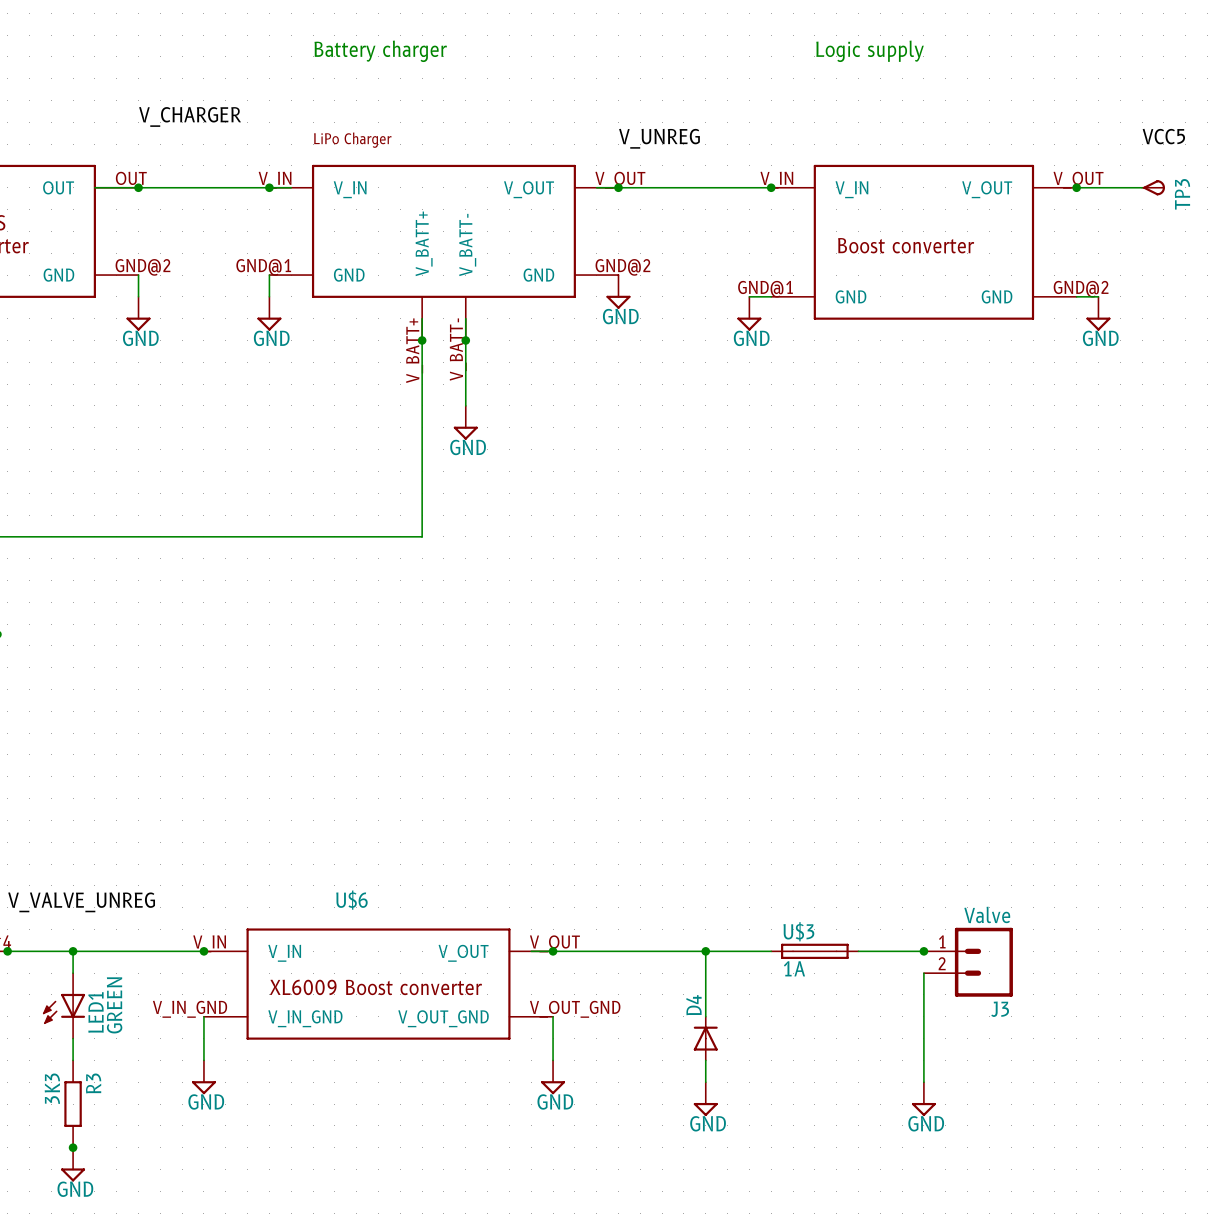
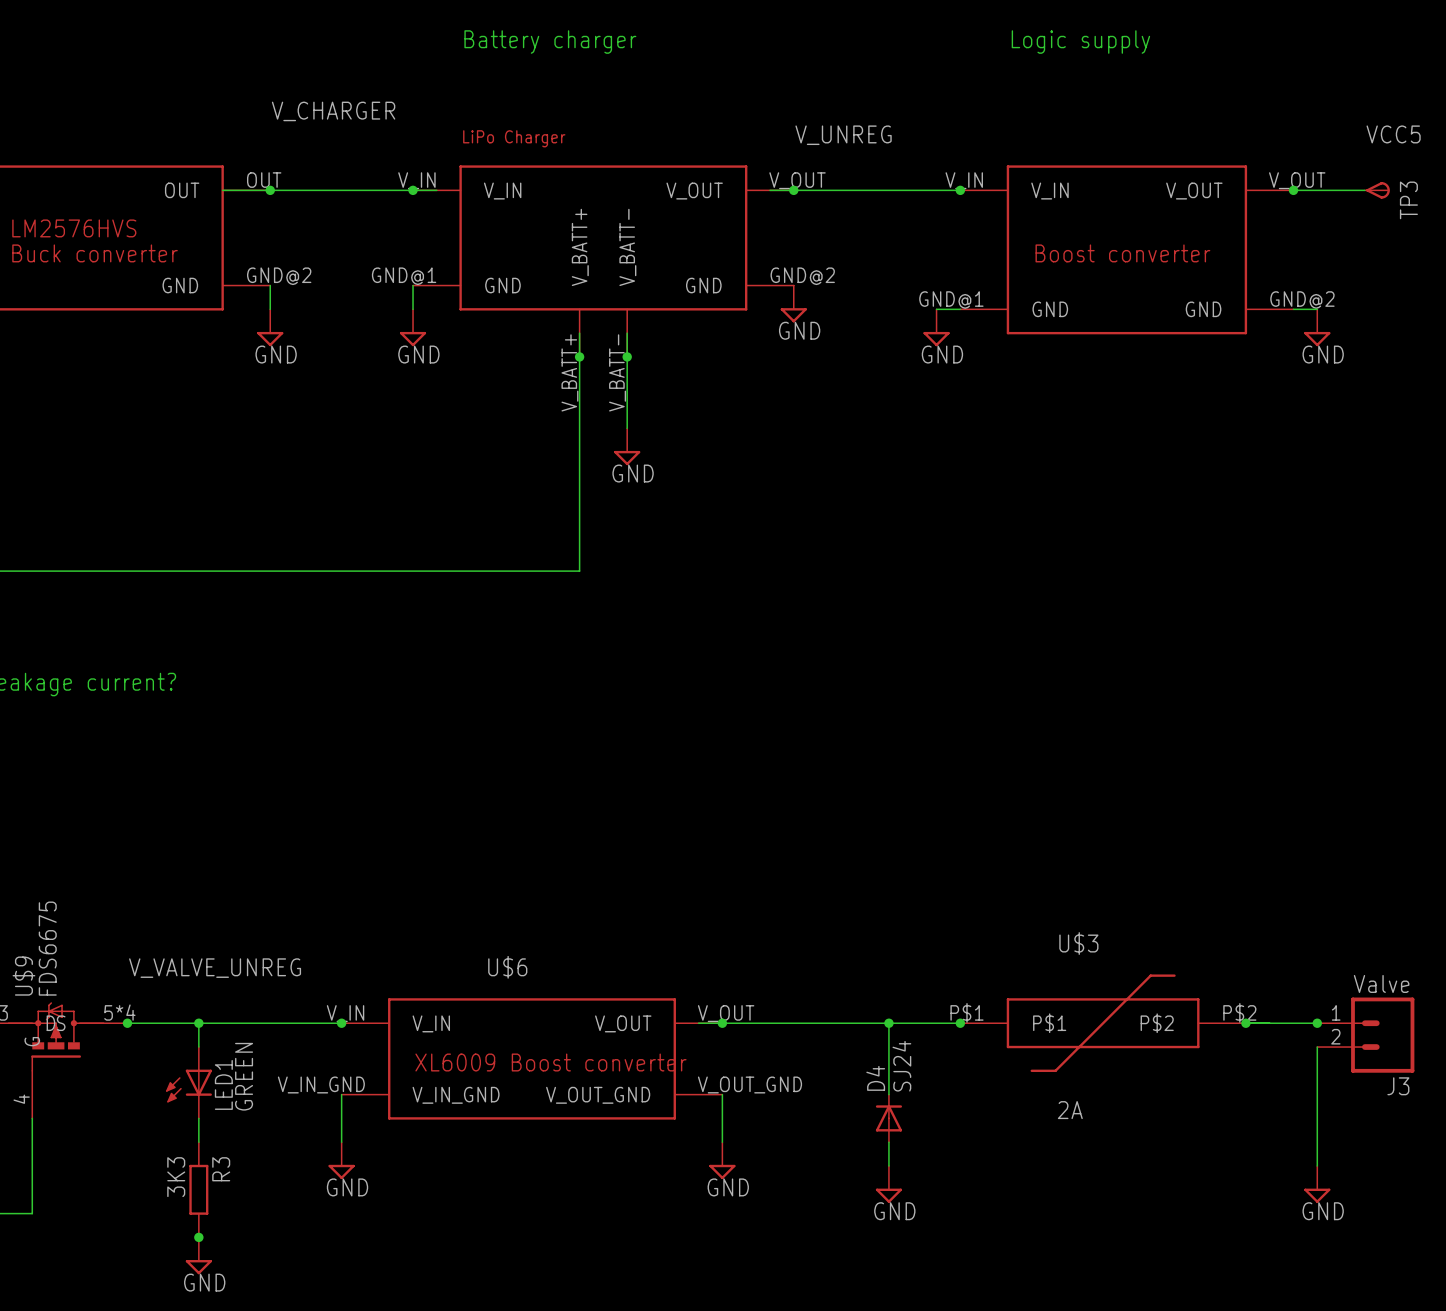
U$3 name position: U$3 (798, 931) -> U$3 (1078, 943)
U$3 symbol: [771, 943, 859, 959] -> [960, 974, 1246, 1073]
junction: none -> (960, 1023)
wire: (858, 951) (923, 951) -> (1245, 1023) (1317, 1023)
junction: (923, 951) -> none
junction: none -> (1245, 1023)
junction: none -> (1317, 1023)
J3 position: (968, 962) -> (1365, 1035)
U$3 value: 1A (794, 968) -> 2A (1070, 1110)
wire: (923, 973) (923, 1082) -> (1317, 1047) (1317, 1166)
D4 value: none -> SJ24 (901, 1066)
power symbol position: GND (923, 1099) -> GND (1317, 1184)

